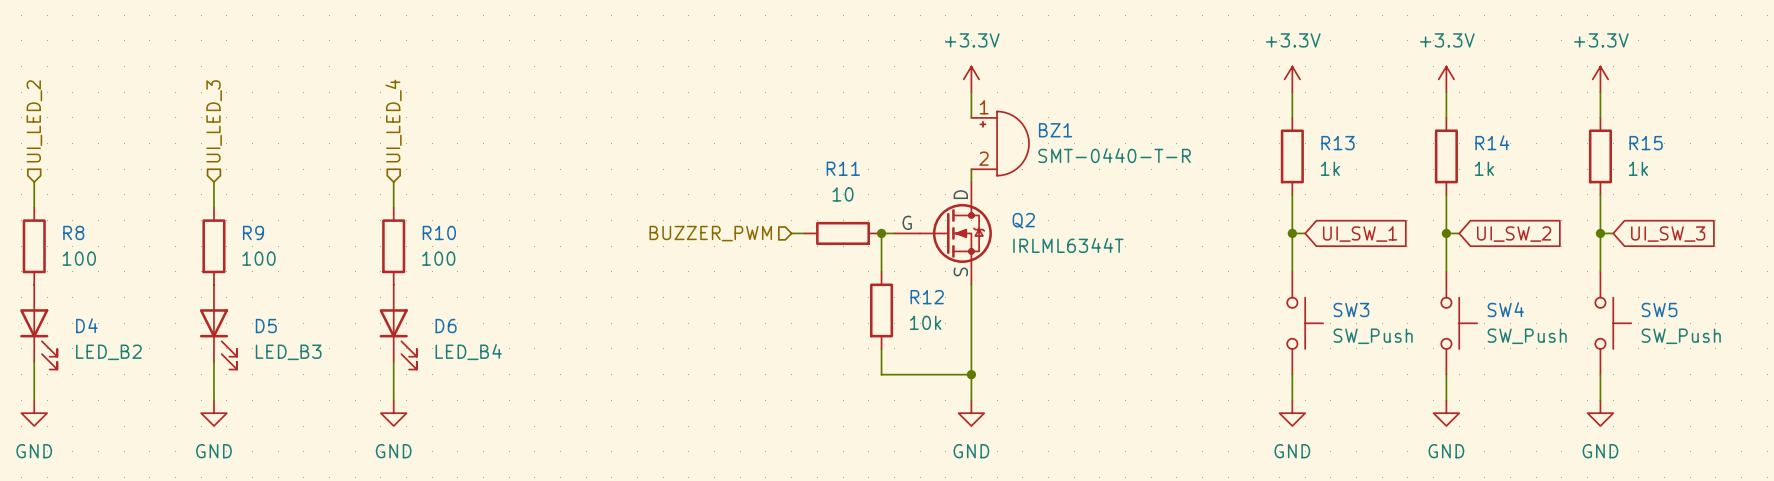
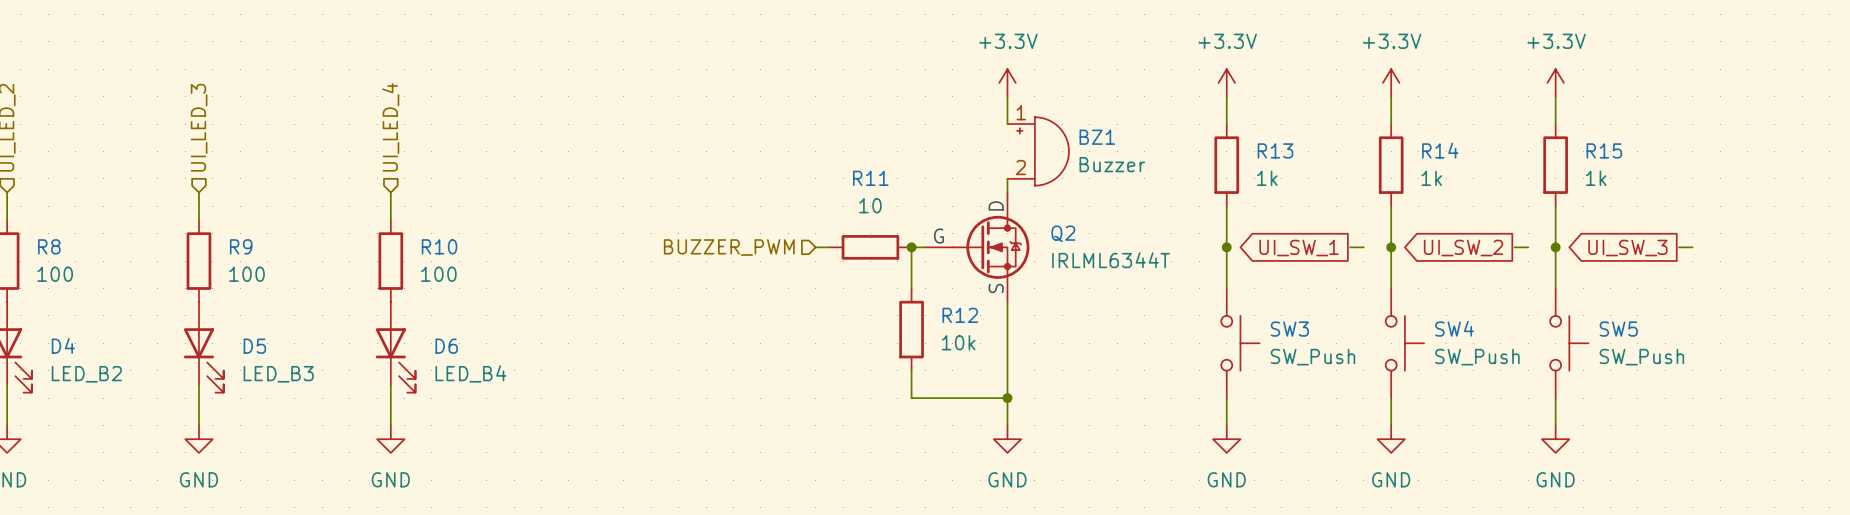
power symbol: none -> +3.3V (1226, 82)
power symbol position: +3.3V (1292, 79) -> +3.3V (1391, 82)
power symbol position: +3.3V (1446, 79) -> +3.3V (1555, 82)
power symbol: +3.3V (1600, 79) -> none
wire: (1292, 92) (1292, 117) -> (1226, 96) (1226, 124)
wire: (1446, 92) (1446, 117) -> (1391, 96) (1391, 124)
wire: (1600, 92) (1600, 117) -> (1555, 96) (1555, 124)
BZ1 value: SMT-0440-T-R (1114, 155) -> Buzzer (1112, 164)
R13 position: (1292, 156) -> (1226, 165)
R14 position: (1446, 156) -> (1391, 165)
R15 position: (1600, 156) -> (1555, 165)
wire: (1292, 194) (1292, 271) -> (1226, 206) (1226, 288)
wire: (1446, 194) (1446, 271) -> (1391, 206) (1391, 288)
wire: (1600, 194) (1600, 271) -> (1555, 206) (1555, 288)
junction: none -> (1226, 247)
junction position: (1292, 233) -> (1391, 247)
junction position: (1446, 233) -> (1555, 247)
junction: (1600, 233) -> none
global label position: UI_SW_1 (1360, 234) -> UI_SW_1 (1299, 248)
global label position: UI_SW_2 (1514, 234) -> UI_SW_2 (1463, 248)
global label position: UI_SW_3 (1668, 234) -> UI_SW_3 (1627, 248)
SW3 position: (1305, 323) -> (1240, 343)
SW4 position: (1459, 323) -> (1404, 343)
SW5 position: (1613, 323) -> (1569, 343)
wire: (1292, 374) (1292, 400) -> (1226, 398) (1226, 425)
wire: (1446, 374) (1446, 400) -> (1391, 398) (1391, 425)
wire: (1600, 374) (1600, 400) -> (1555, 398) (1555, 425)
power symbol: none -> GND (1226, 439)
power symbol position: GND (1292, 413) -> GND (1391, 439)
power symbol position: GND (1446, 413) -> GND (1555, 439)
power symbol: GND (1600, 413) -> none

